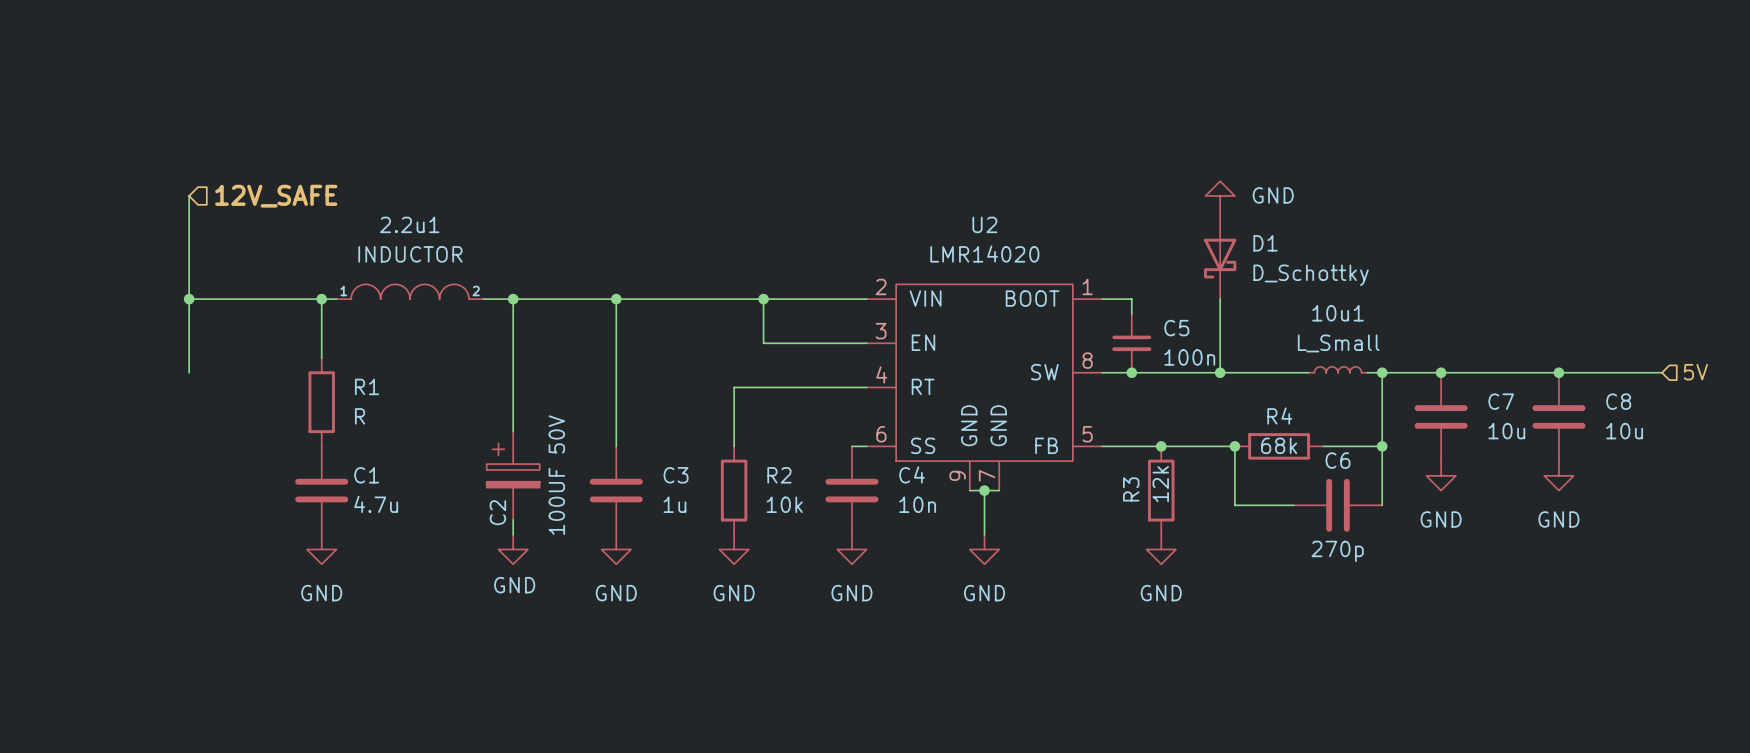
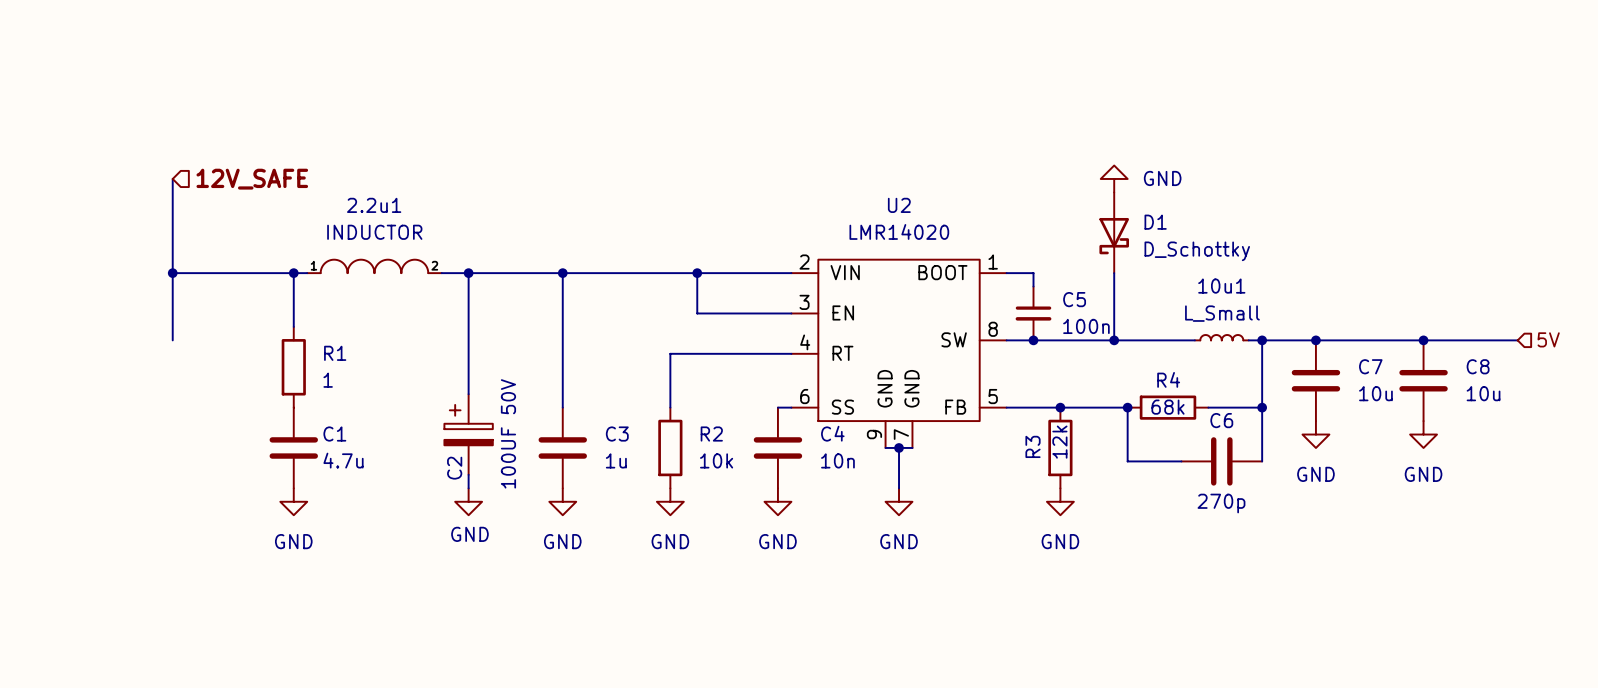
R1 value: R (360, 416) -> 1 (328, 380)

